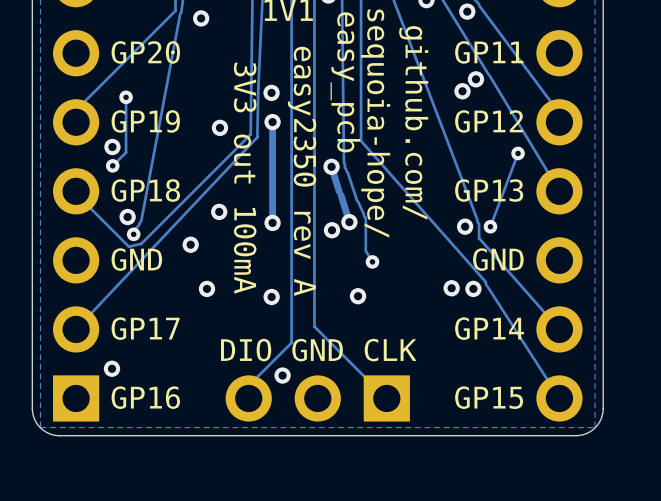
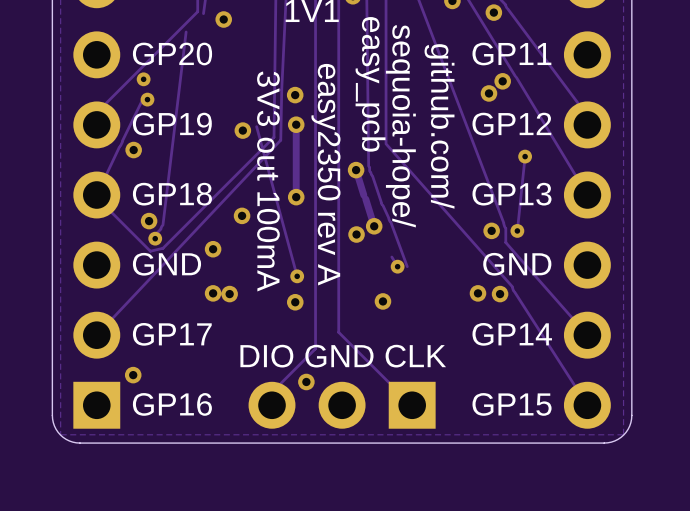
track: (180, 13) (141, 221) -> (186, 31) (162, 225)
via: none -> (143, 79)
track: none -> (142, 99) (122, 141)
track: (126, 97) (126, 152) (112, 165) -> none
track: none -> (256, 126) (297, 276)
track: none -> (122, 142) (120, 145)
track: none -> (119, 146) (96, 195)
track: (518, 153) (490, 226) -> (525, 156) (517, 230)
via position: (518, 153) -> (525, 156)
via: (112, 165) -> none
track: (272, 193) (272, 222) -> none
track: (365, 218) (365, 251) -> (390, 222) (407, 266)
via position: (272, 222) -> (296, 197)
via: none -> (297, 276)
via: none -> (213, 293)

